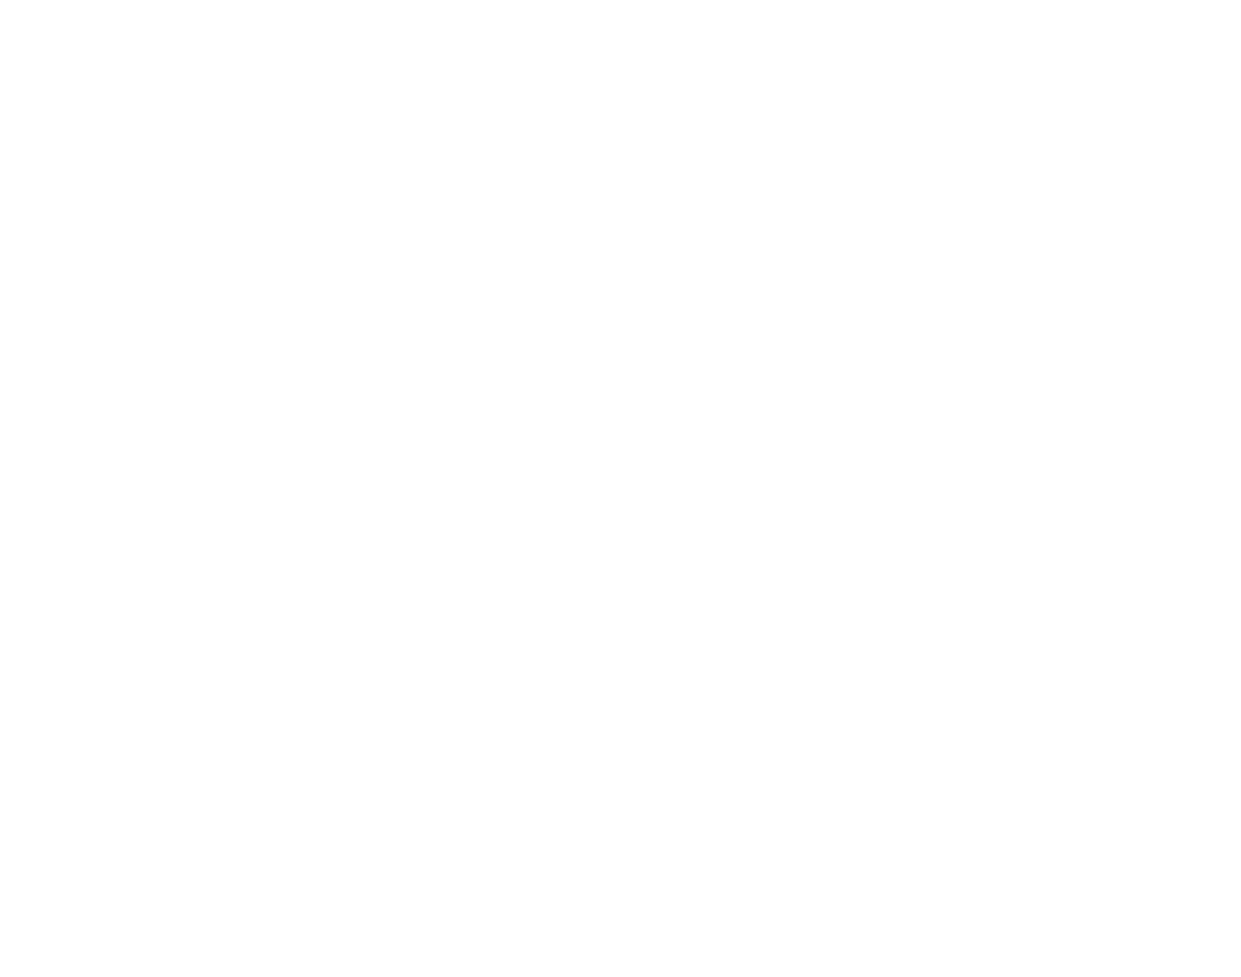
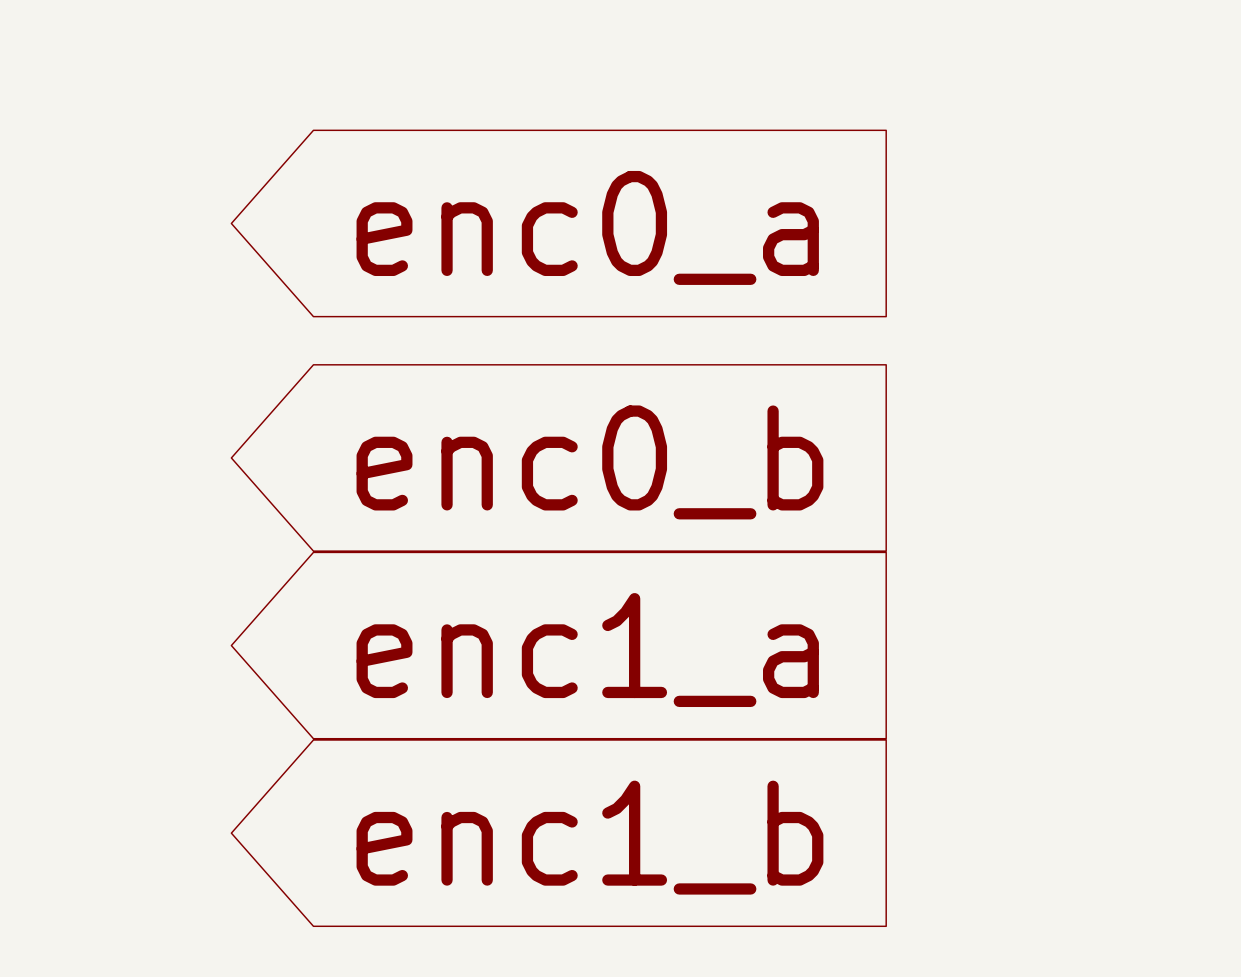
global label: none -> enc0_a (587, 227)
global label: none -> enc0_b (589, 462)
global label: none -> enc1_a (587, 650)
global label: none -> enc1_b (589, 837)

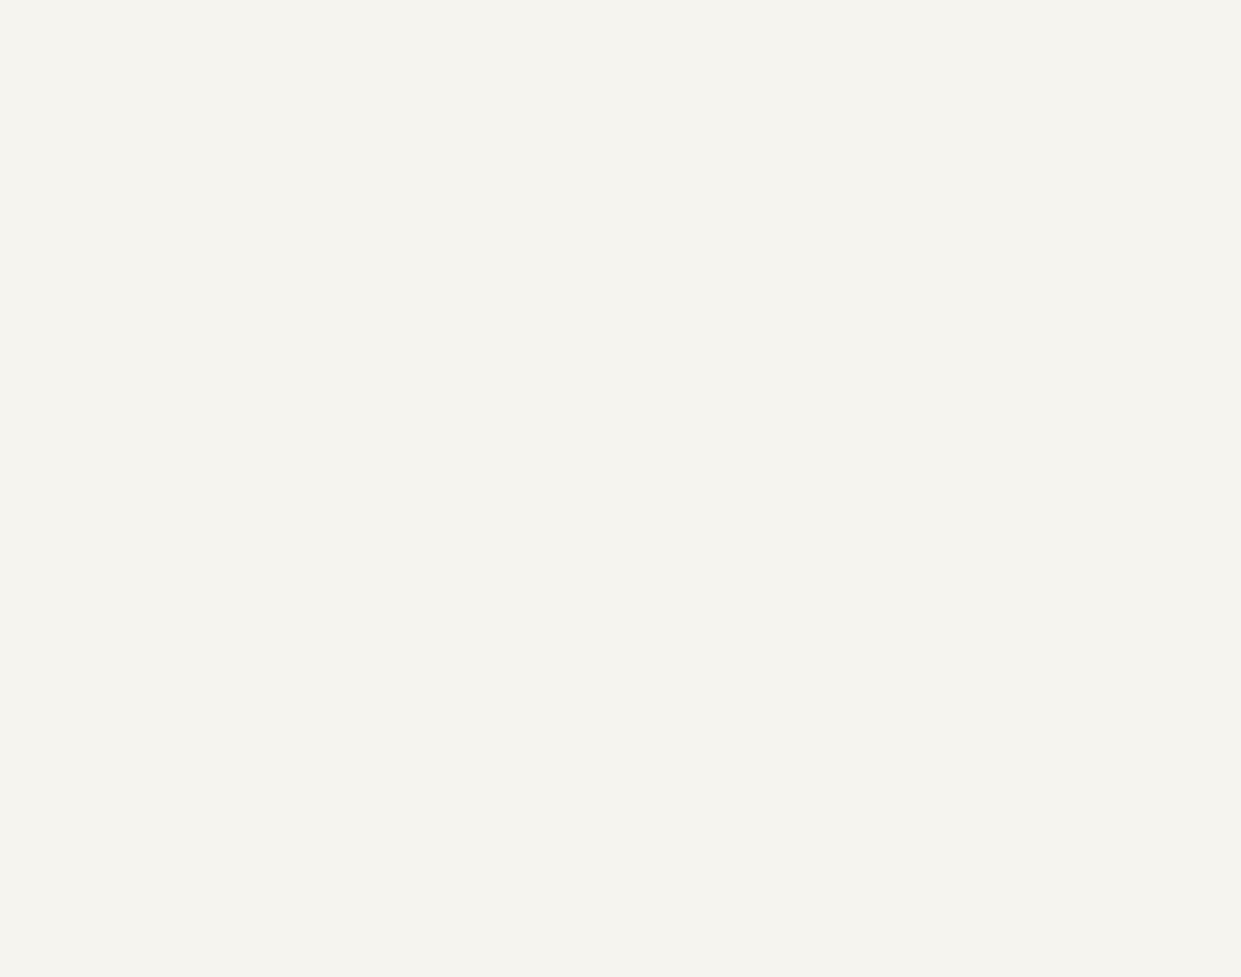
global label: enc0_a (587, 227) -> none
global label: enc0_b (589, 462) -> none
global label: enc1_a (587, 650) -> none
global label: enc1_b (589, 837) -> none

